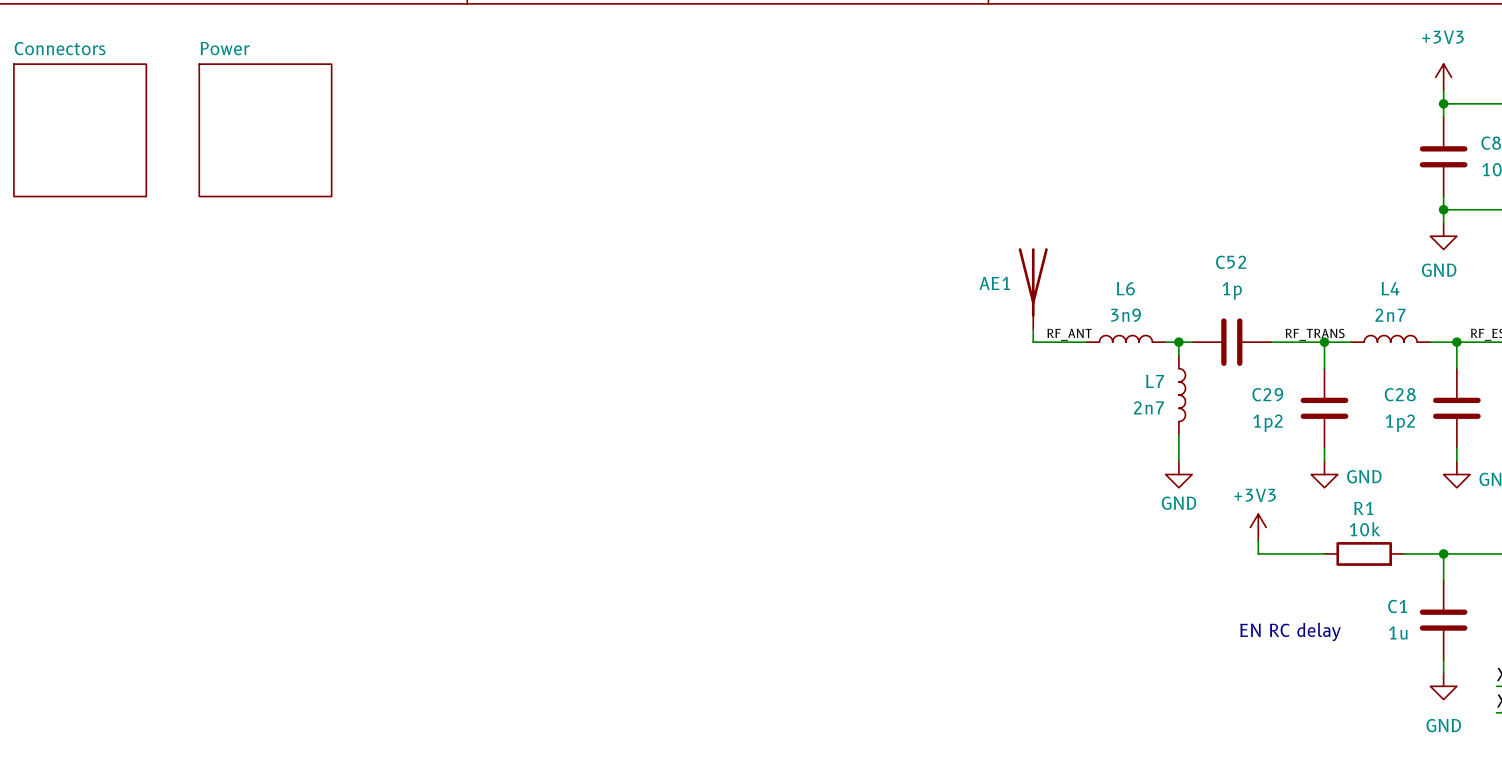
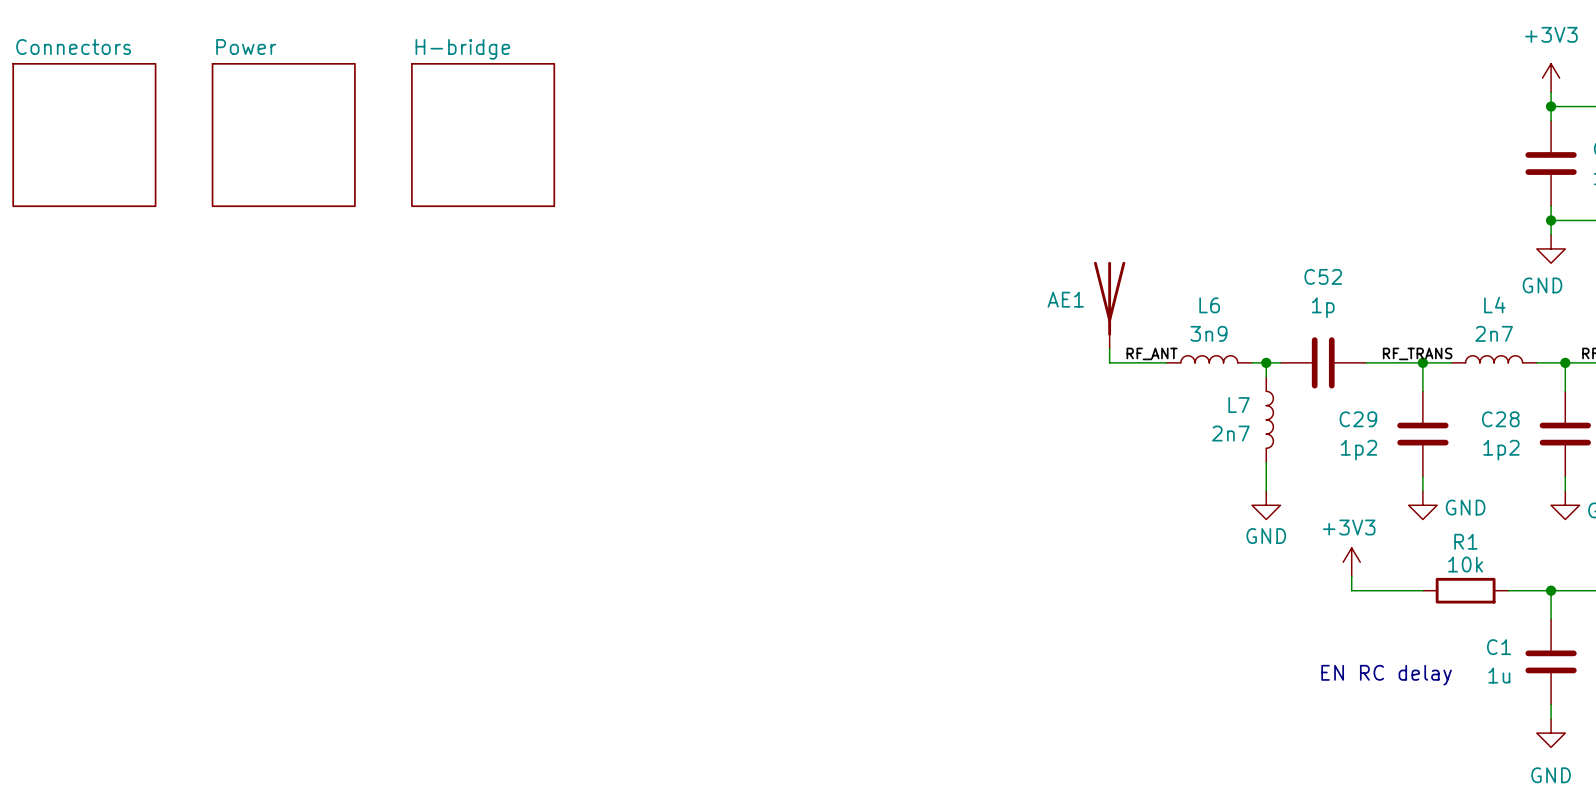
sheet H-bridge: none -> (483, 135)

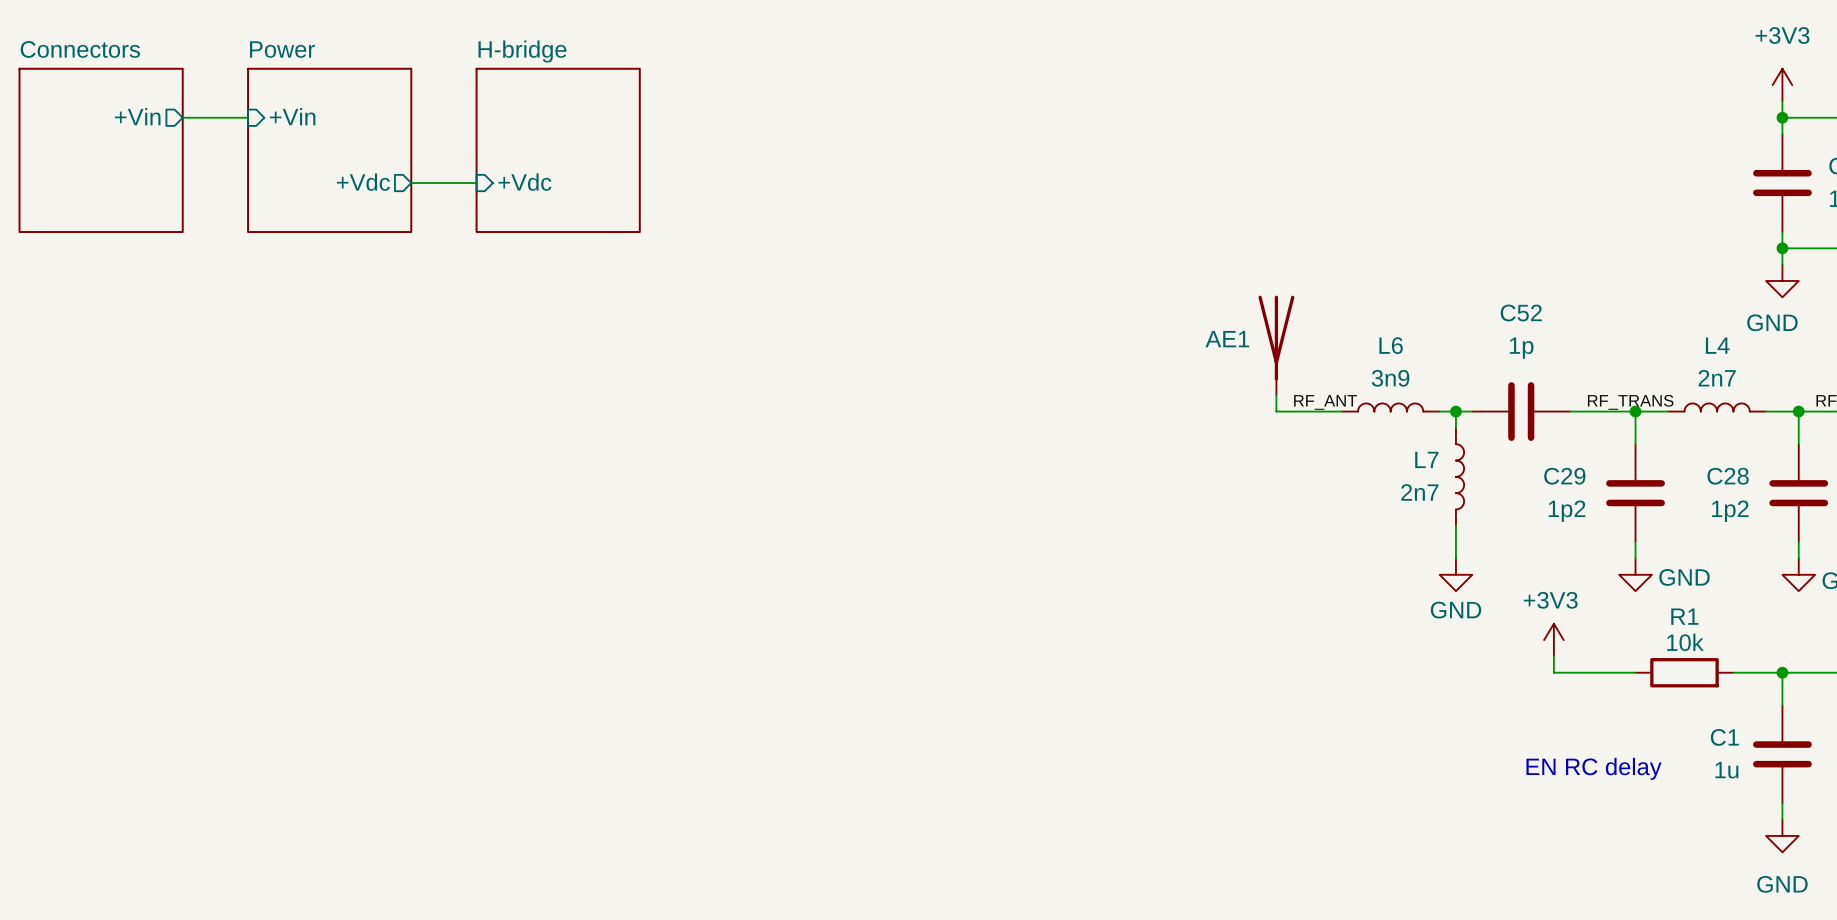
sheet pin: none -> +Vin (137, 116)
wire: none -> (182, 117) (248, 117)
sheet pin: none -> +Vin (292, 116)
sheet pin: none -> +Vdc (363, 182)
sheet pin: none -> +Vdc (524, 182)
wire: none -> (411, 183) (476, 183)

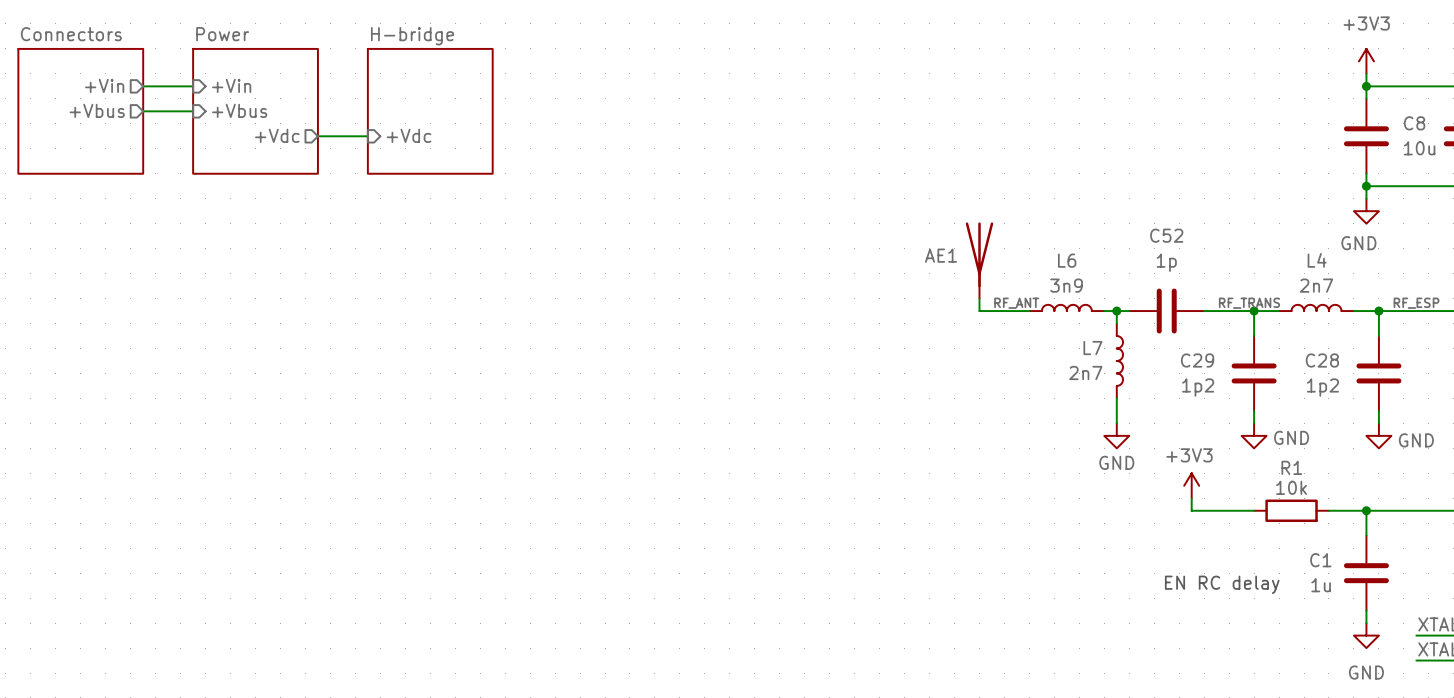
sheet pin: none -> +Vbus (97, 110)
sheet pin: none -> +Vbus (239, 110)
wire: none -> (143, 111) (193, 111)

